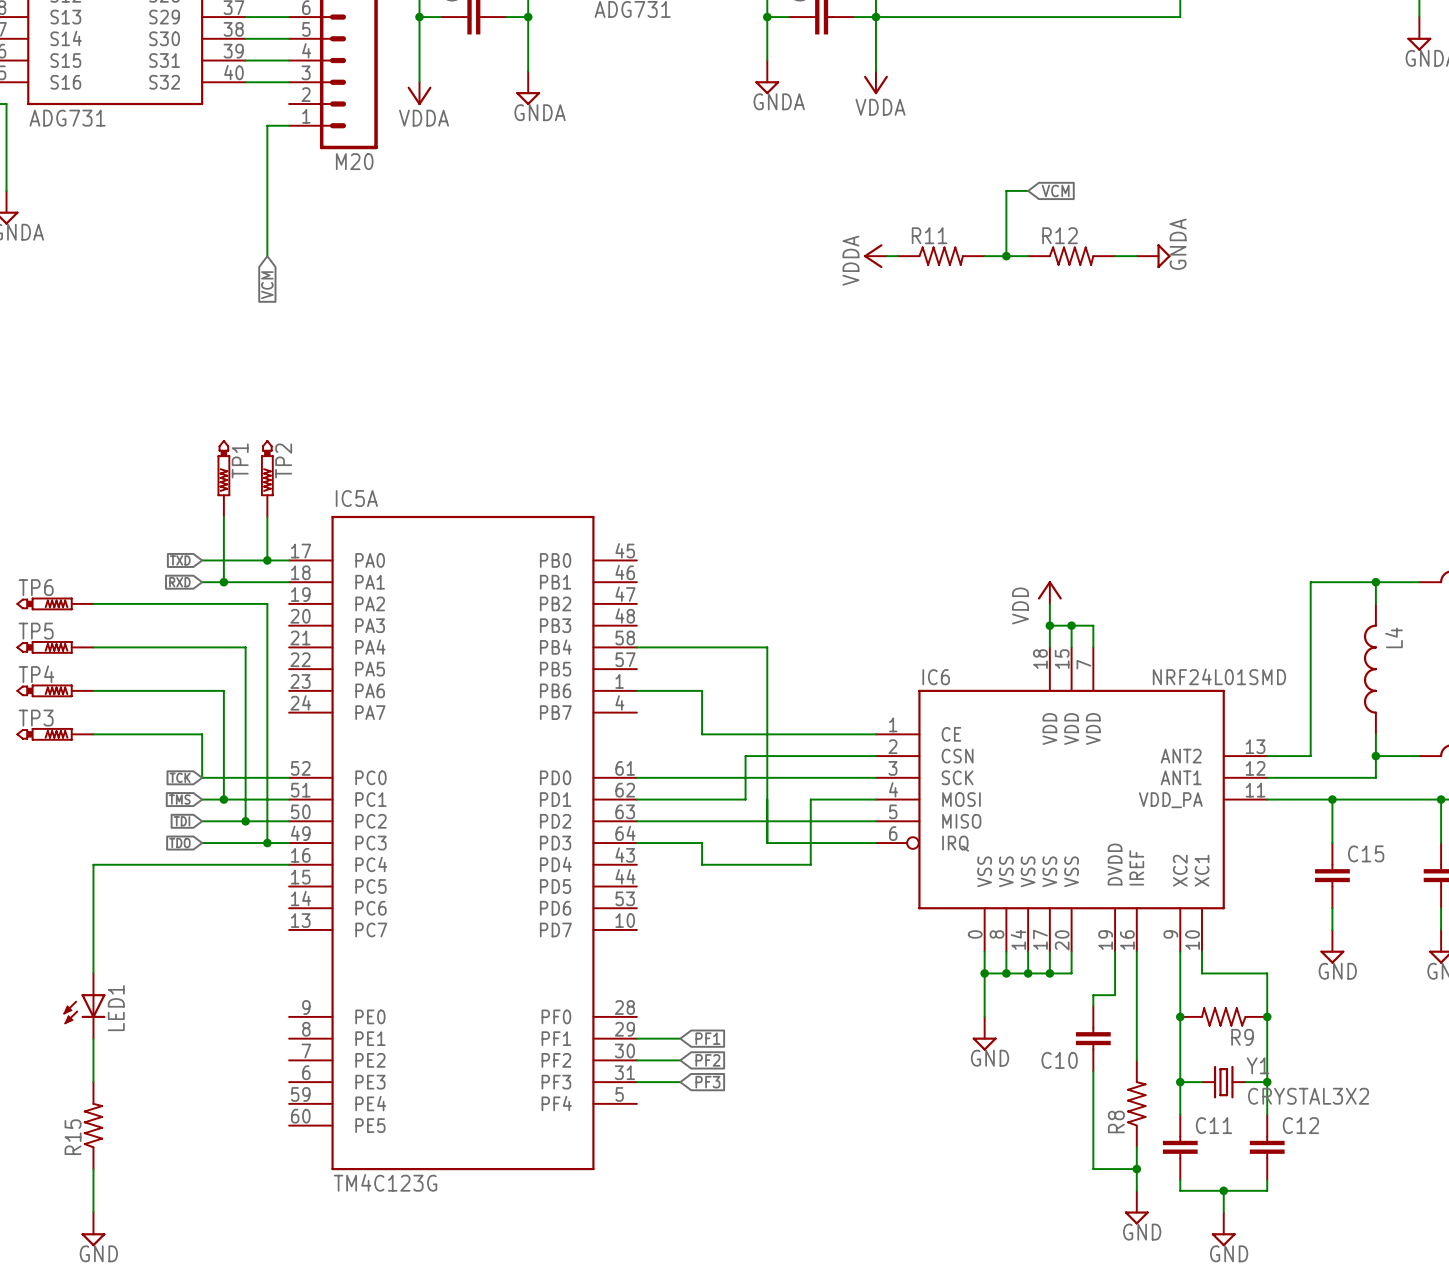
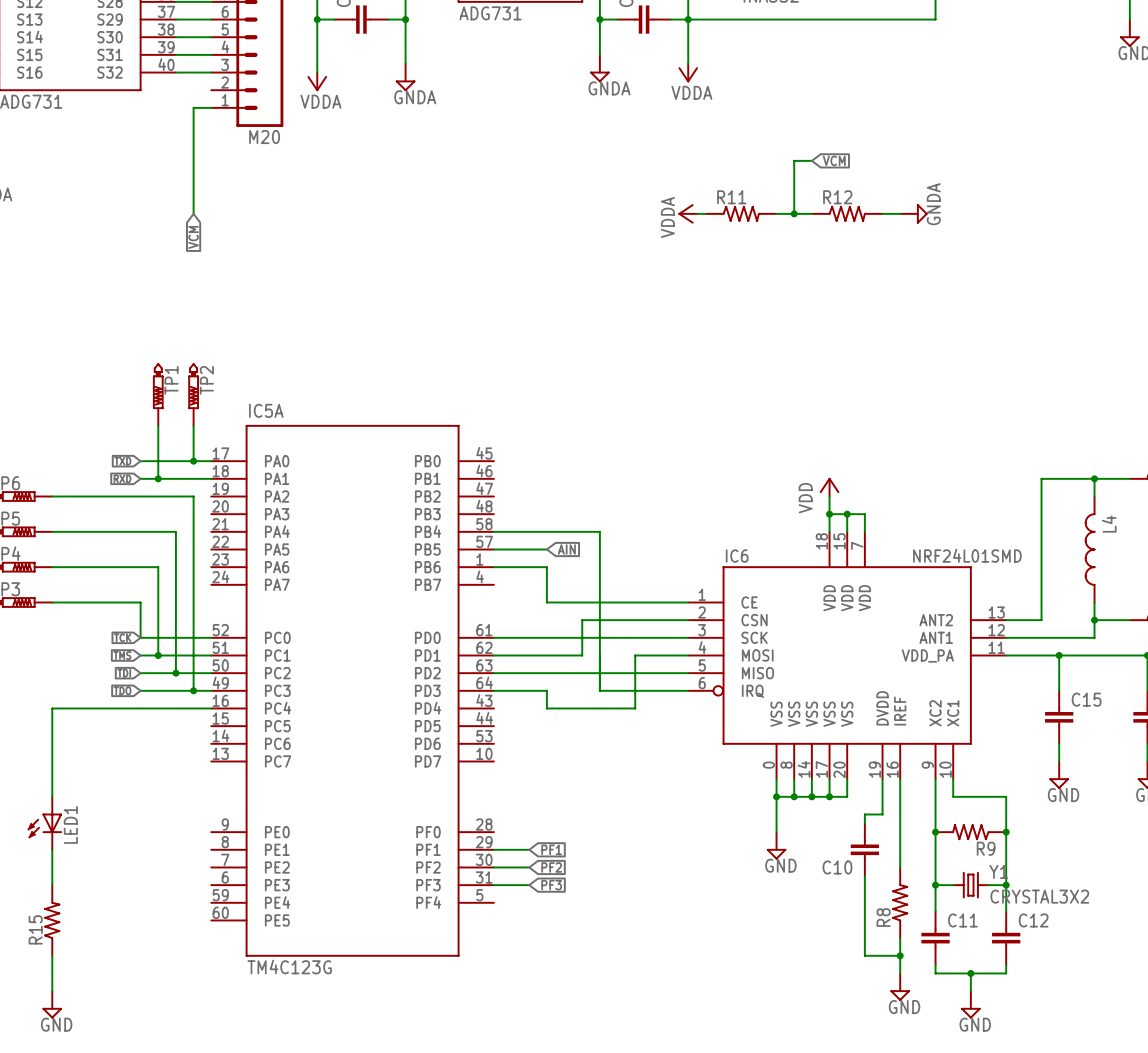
wire: none -> (493, 549) (546, 549)
global label: none -> AIN (566, 549)

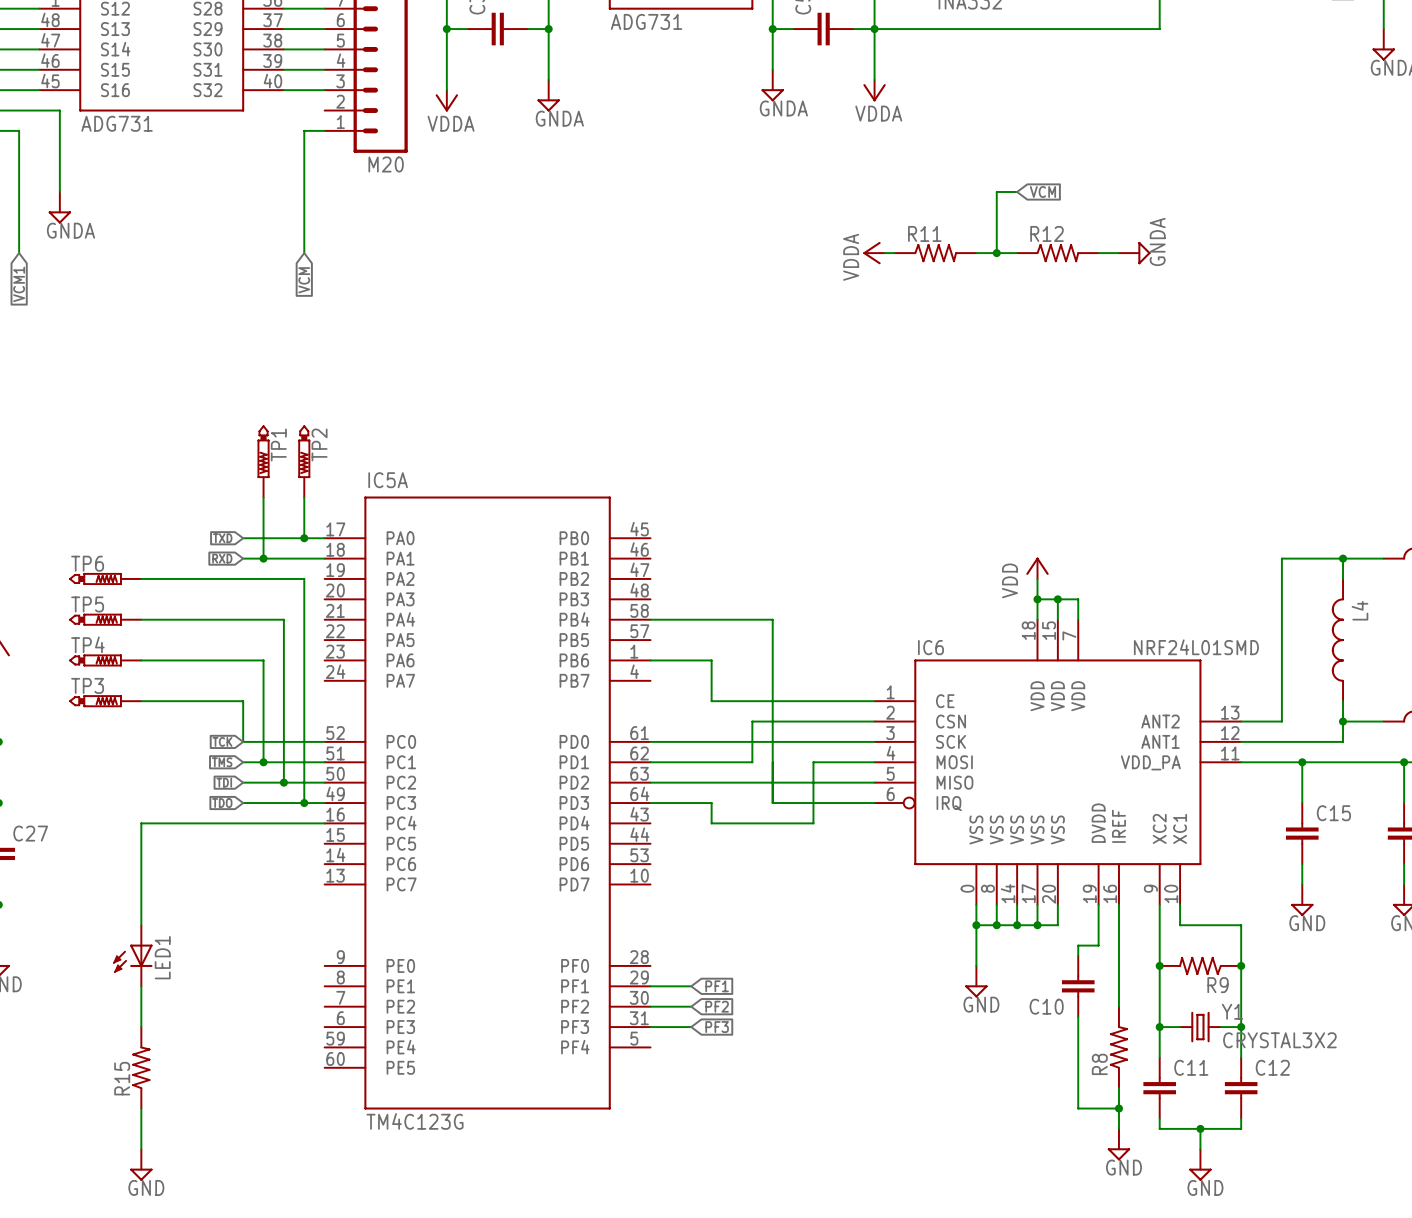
wire: (493, 549) (546, 549) -> none
global label: AIN (566, 549) -> none

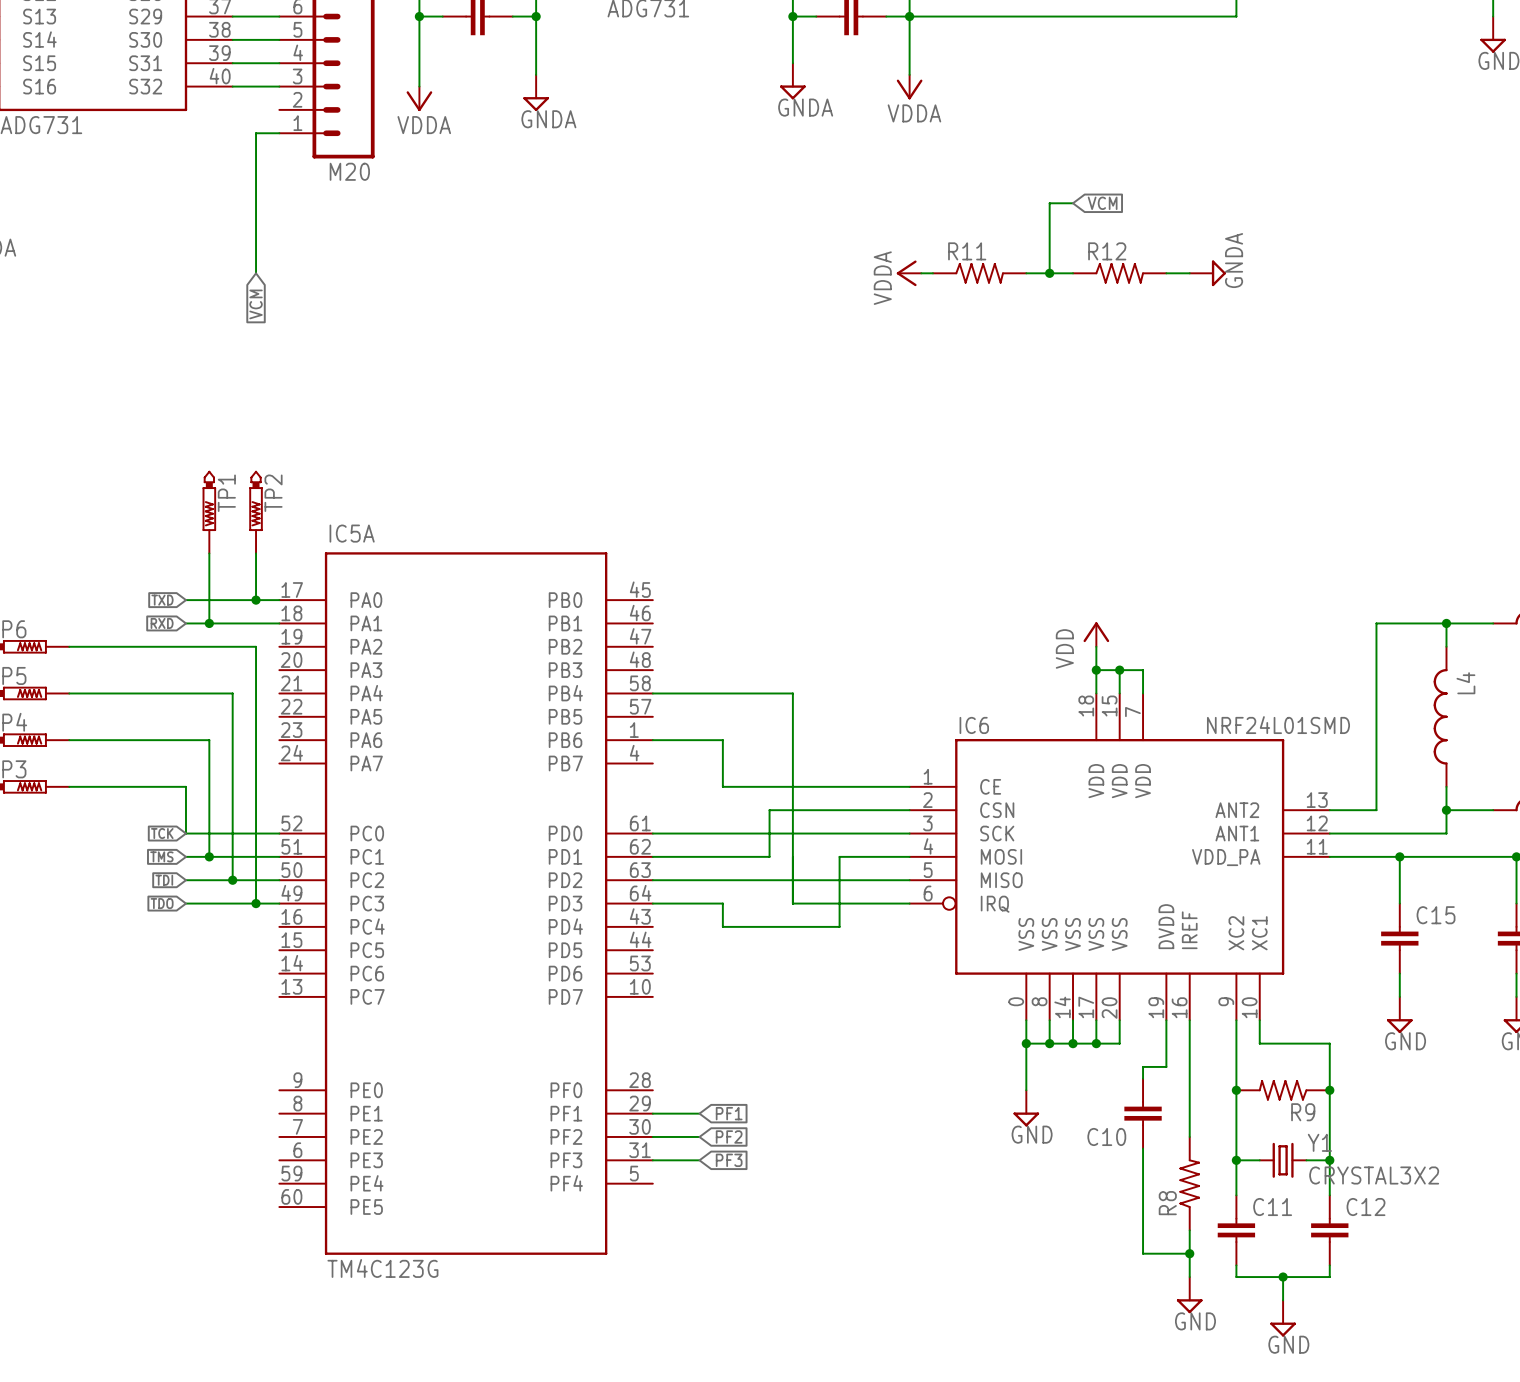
wire: (324, 823) (141, 823) (141, 925) -> none
LED1: (132, 955) -> none
wire: (141, 986) (141, 1027) -> none
R15: (141, 1067) -> none
wire: (141, 1108) (141, 1149) -> none
power symbol: GND (141, 1165) -> none

